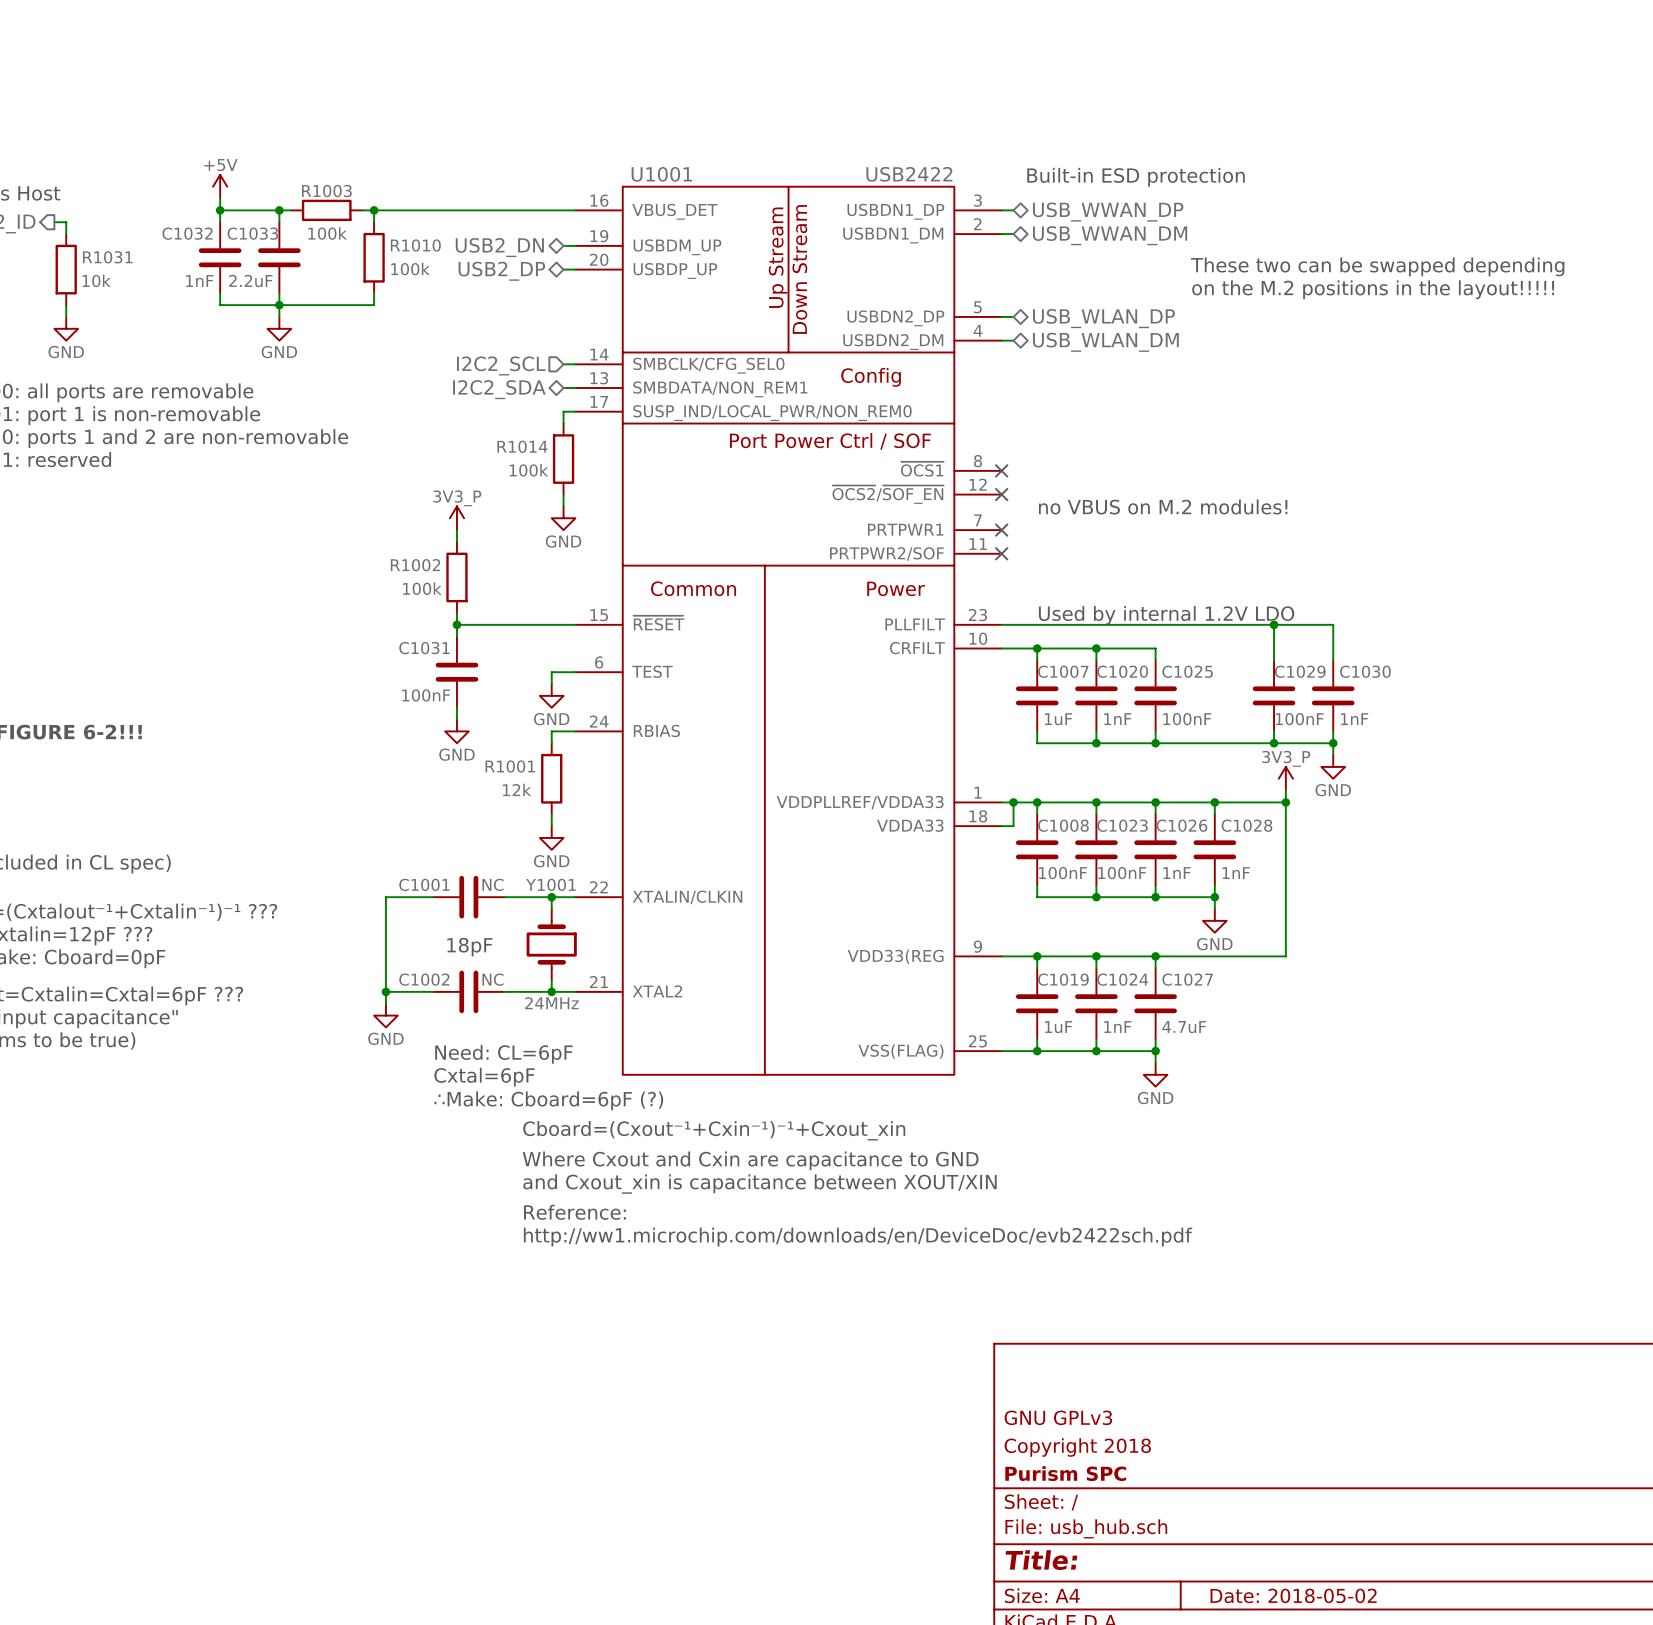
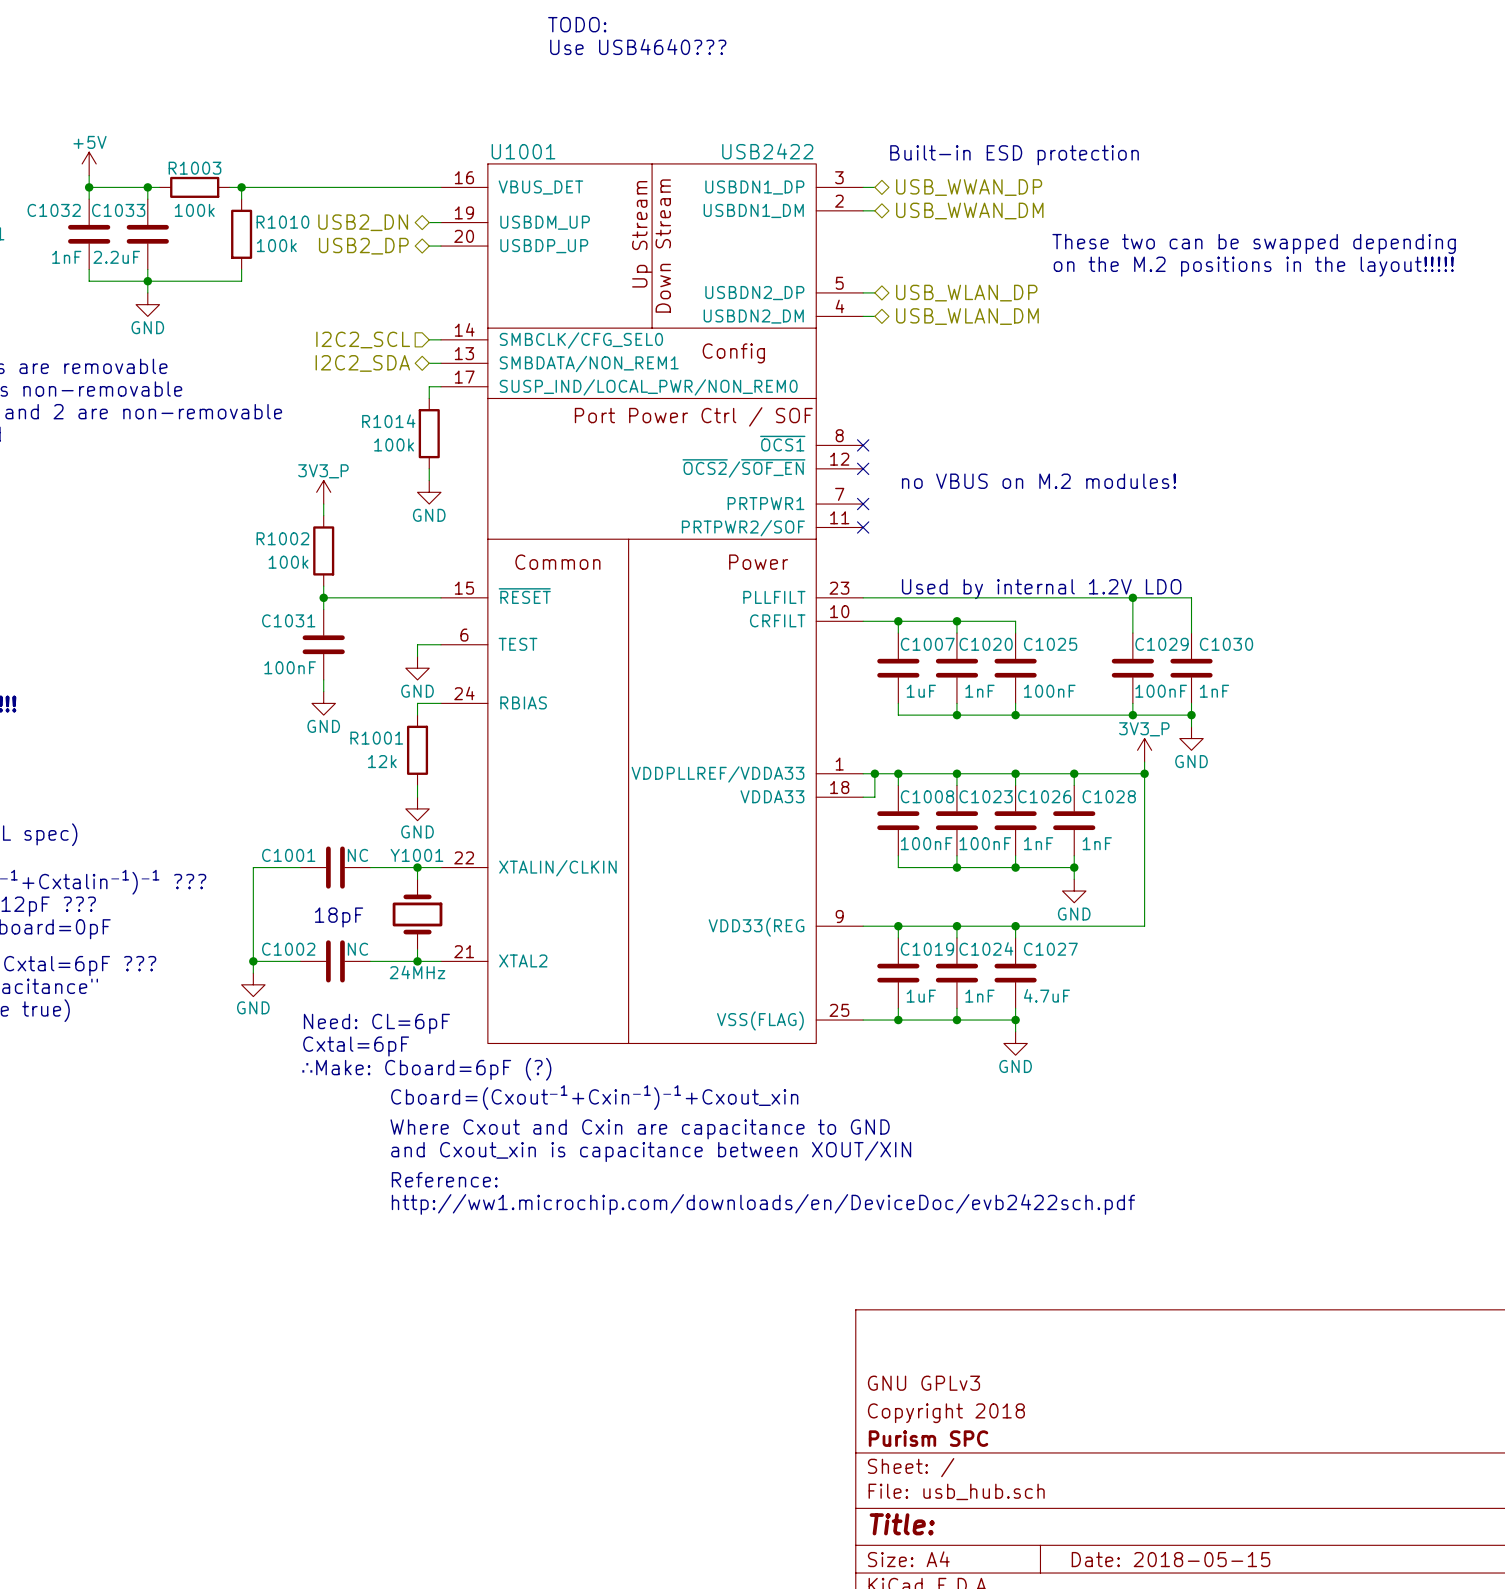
text: none -> TODO: (577, 24)
text: none -> Use USB4640??? (638, 47)
title block: Date: 2018-05-02 (1293, 1595) -> Date: 2018-05-15 (1170, 1559)

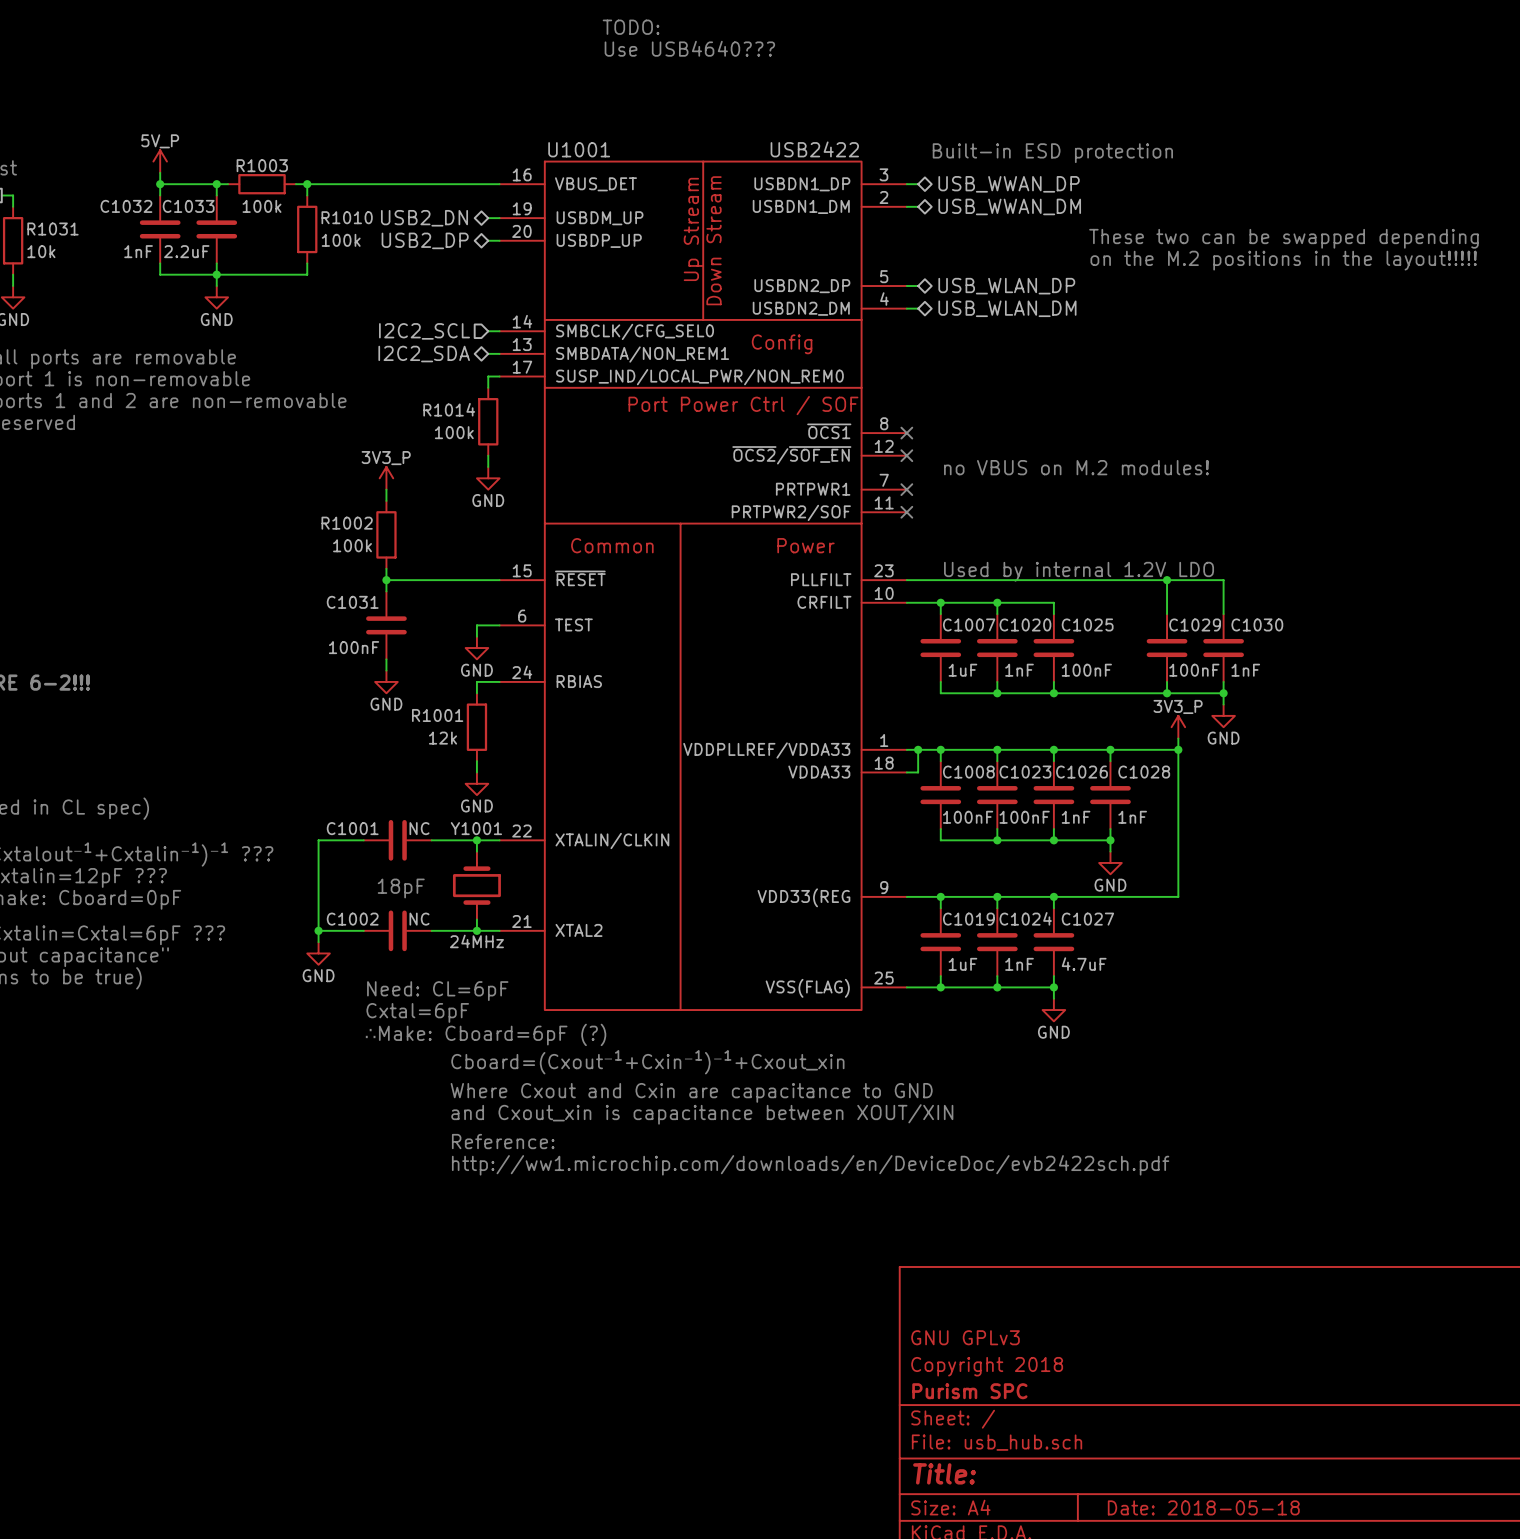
power symbol: +5V (89, 163) -> 5V_P (160, 161)
title block: Date: 2018-05-15 (1170, 1559) -> Date: 2018-05-18 (1203, 1507)

